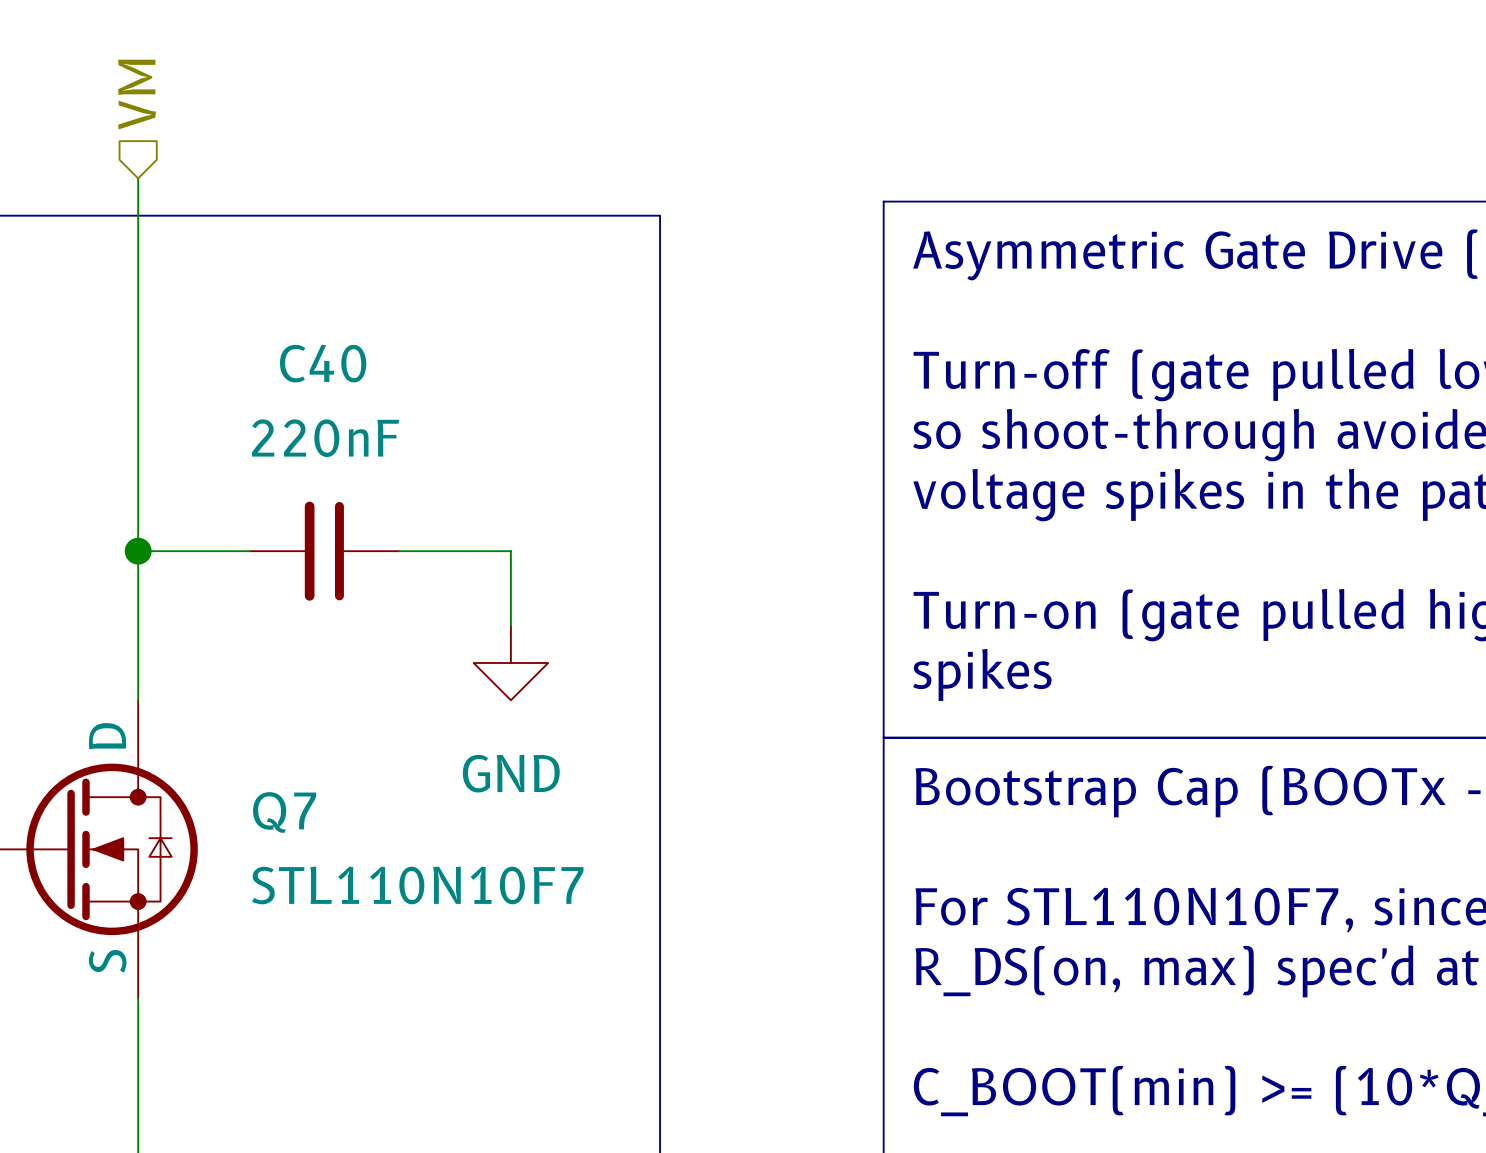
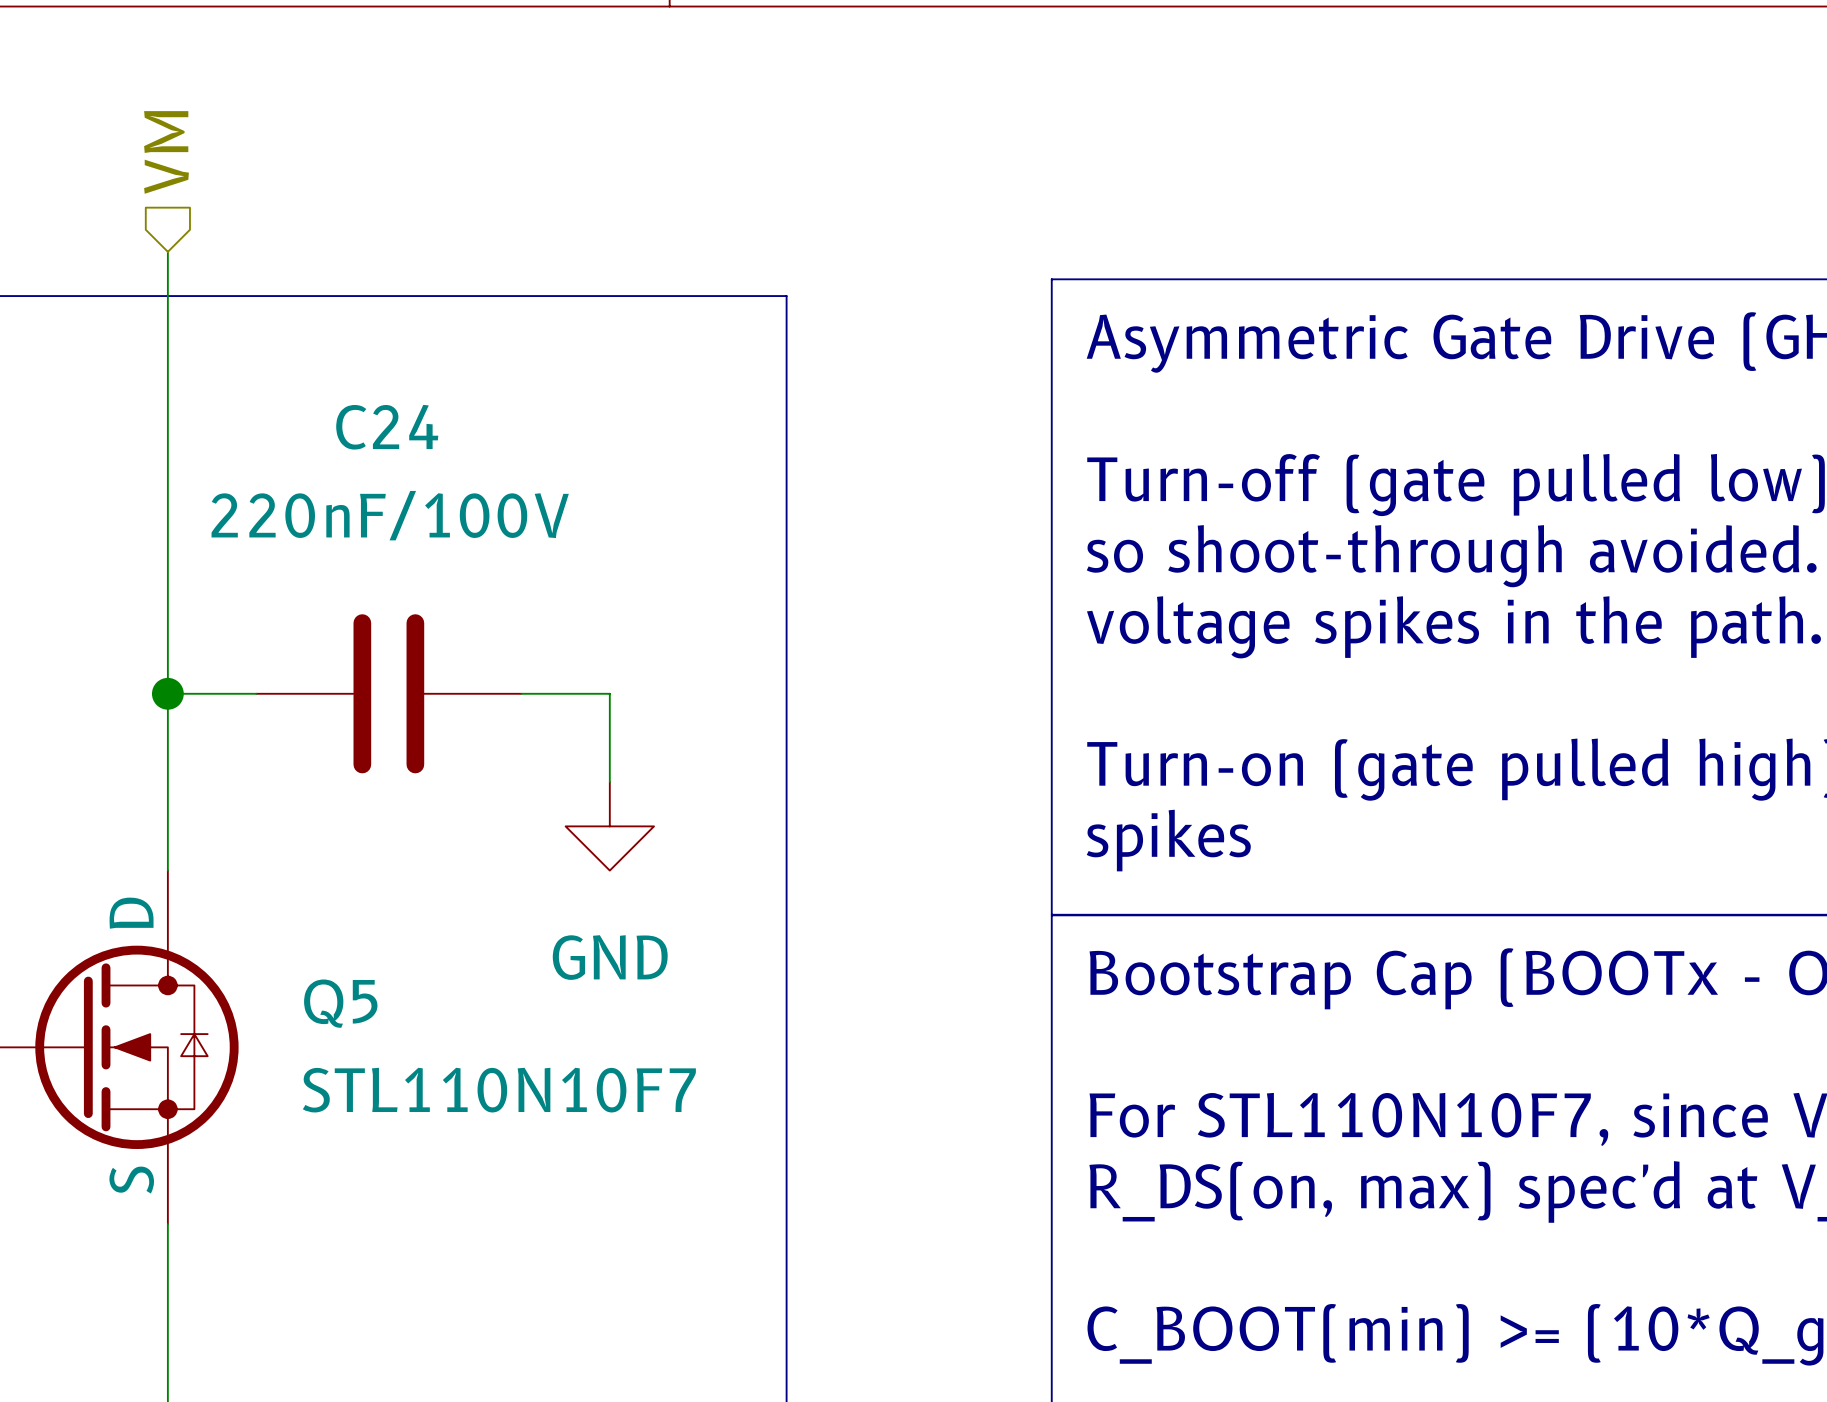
C40: 220nF (324, 551) -> none
C24: none -> 220nF/100V (388, 693)
Q7 name: Q7 (284, 812) -> Q5 (340, 1003)

